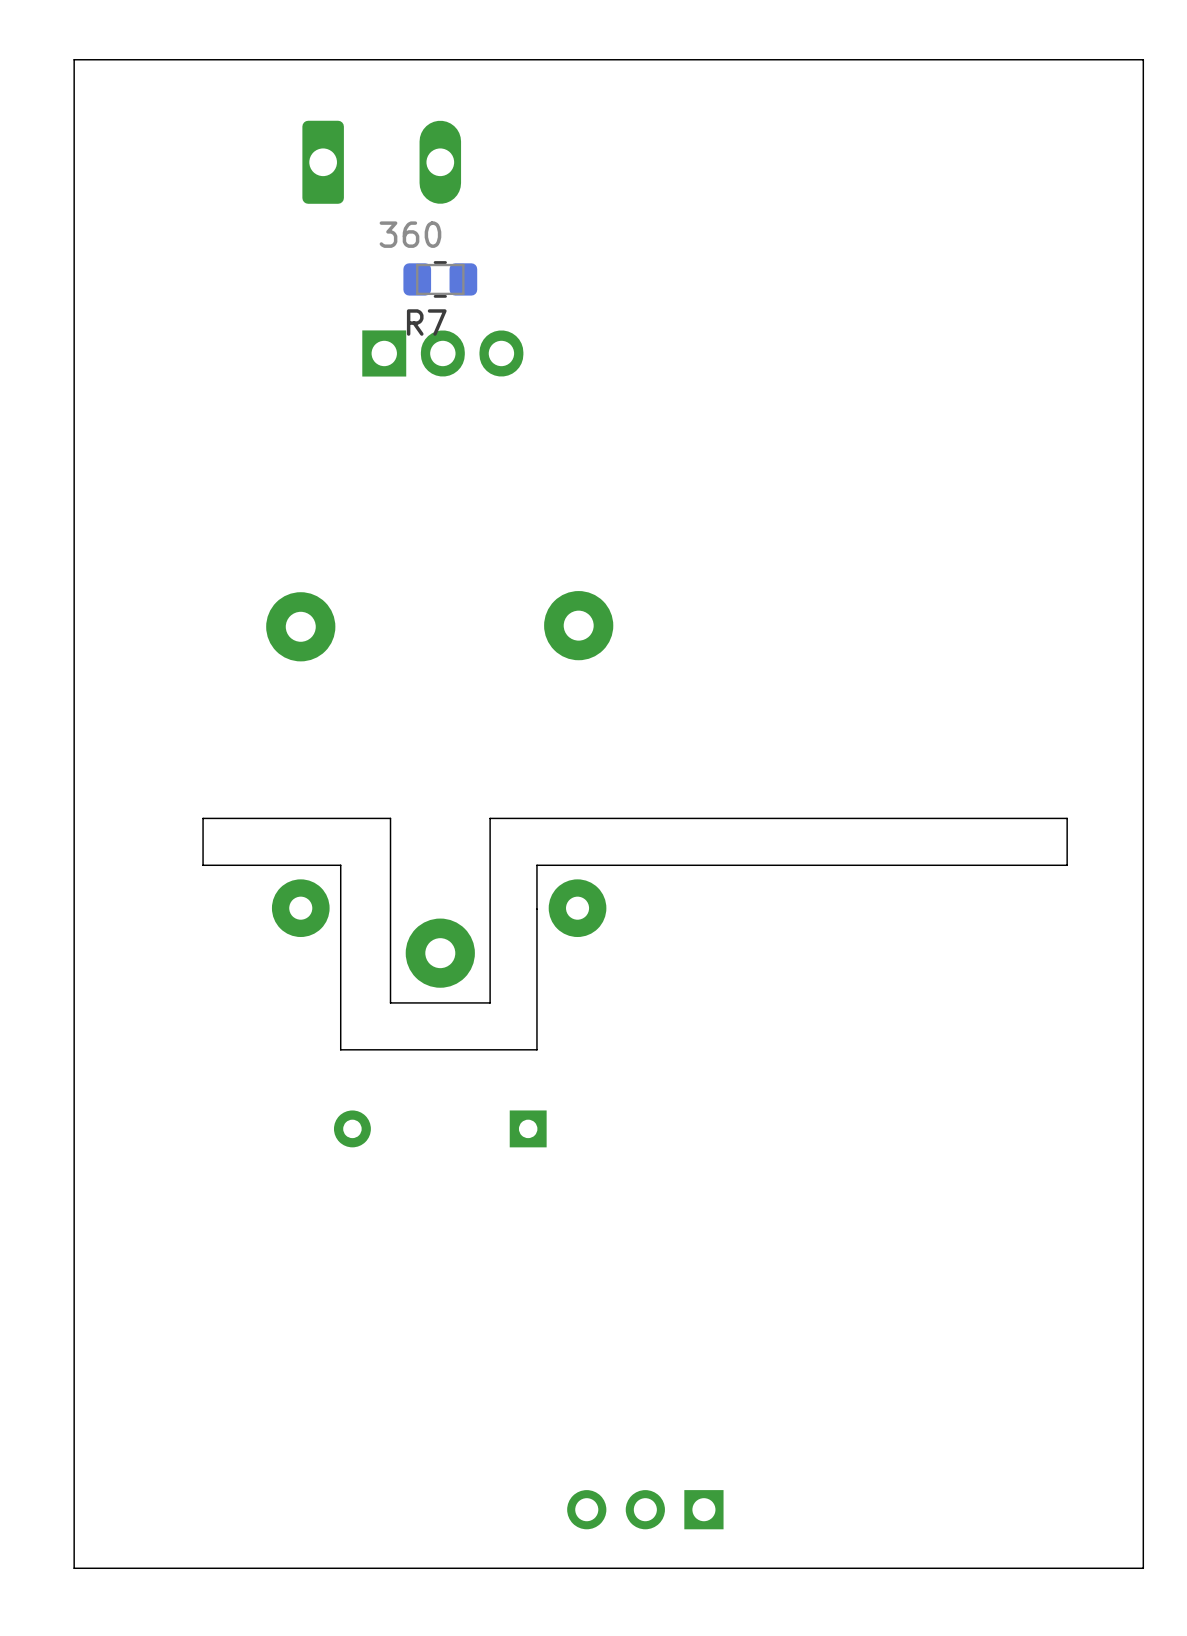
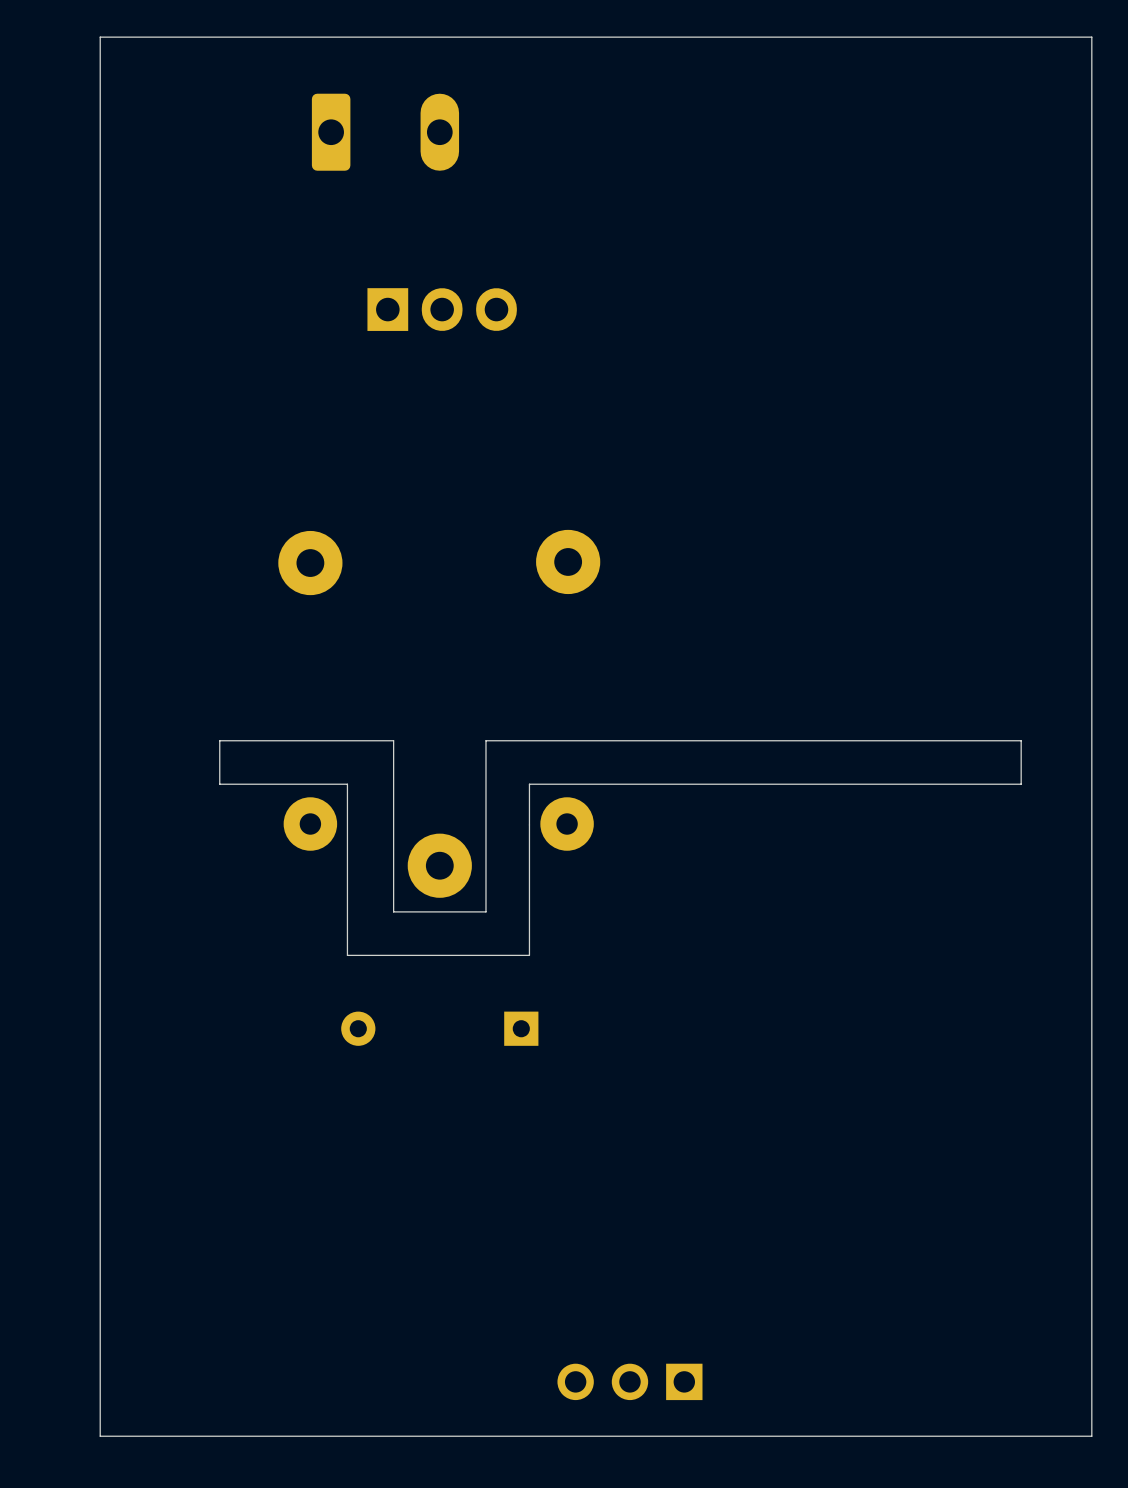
R7: 360 (440, 279) -> none

